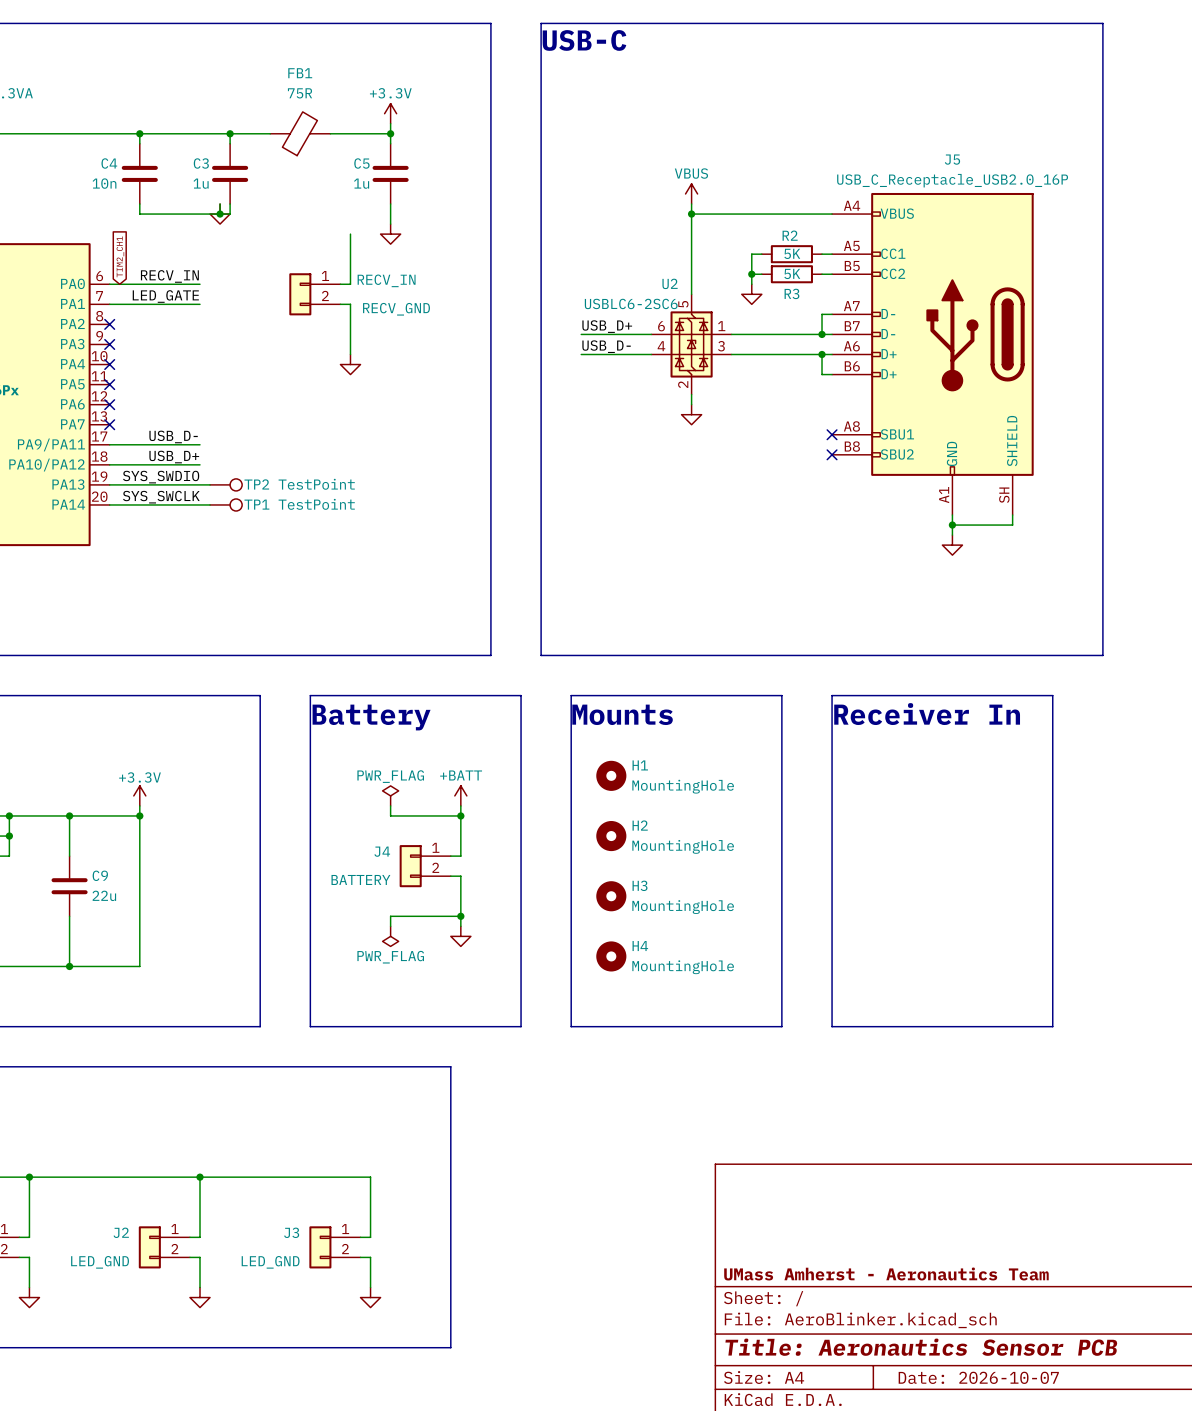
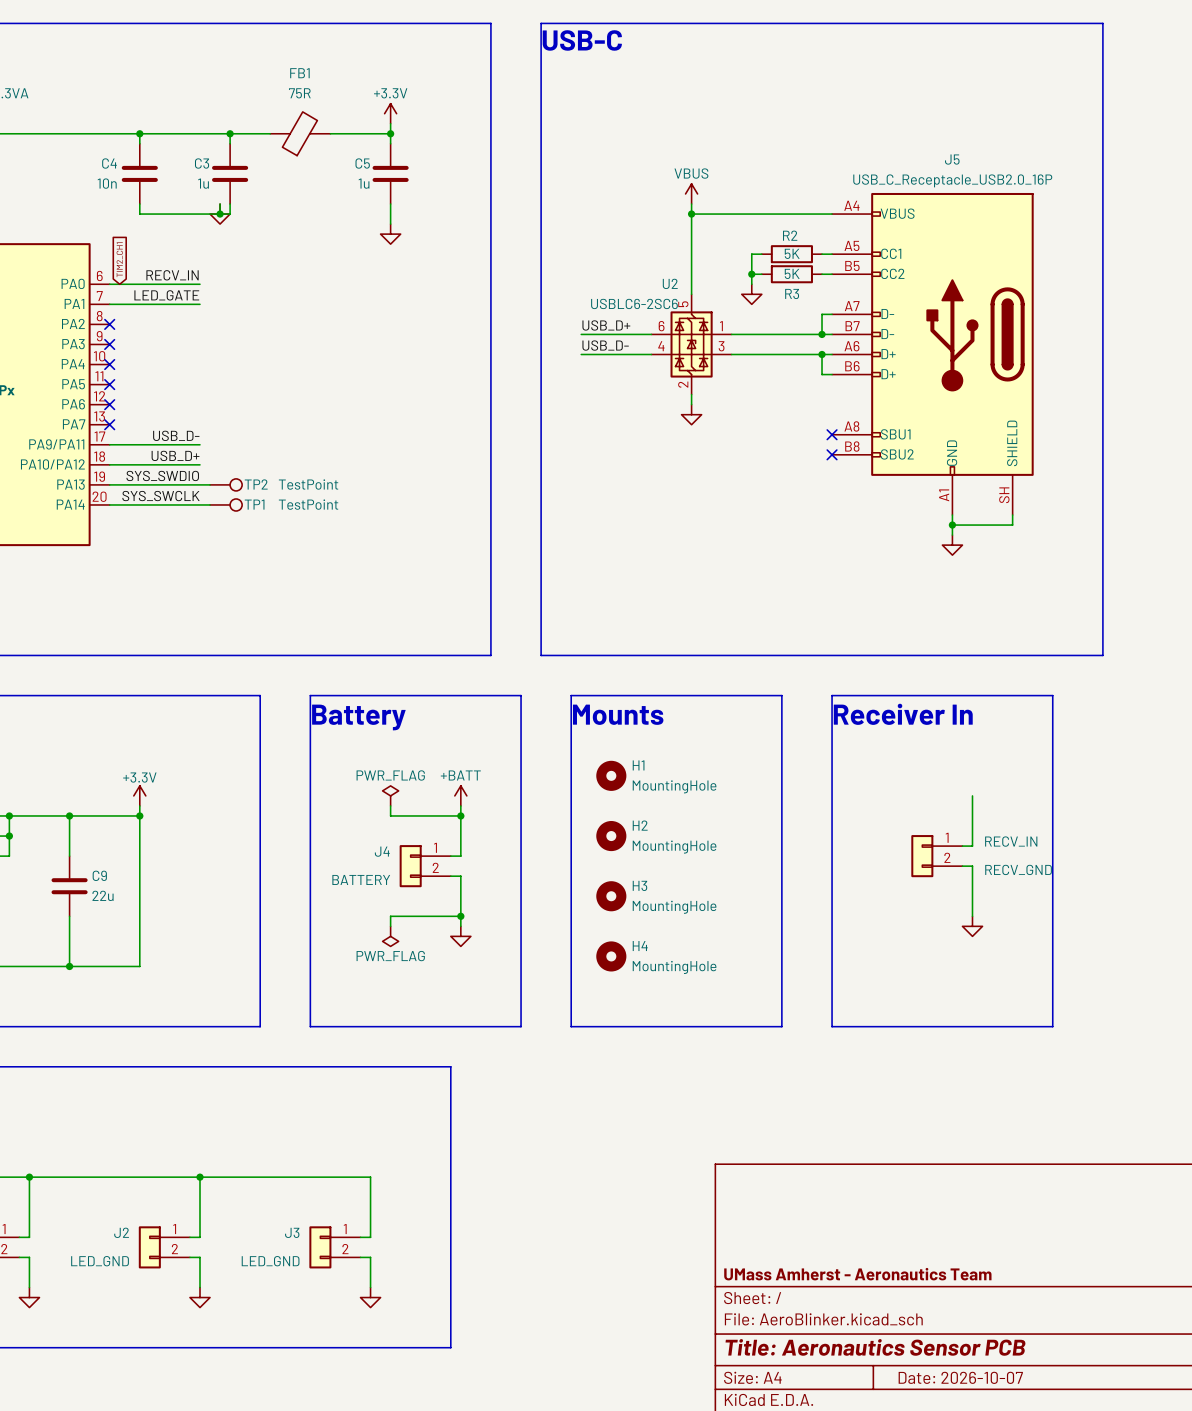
wire: (350, 234) (350, 284) (340, 284) -> none
RECV_IN: RECV_GND (314, 294) -> none
wire: (340, 304) (350, 304) (350, 354) -> none
power symbol: (350, 364) -> none
wire: none -> (972, 795) (972, 846) (962, 846)
RECV_IN: none -> RECV_GND (936, 856)
wire: none -> (962, 866) (972, 866) (972, 916)
power symbol: none -> (972, 926)

